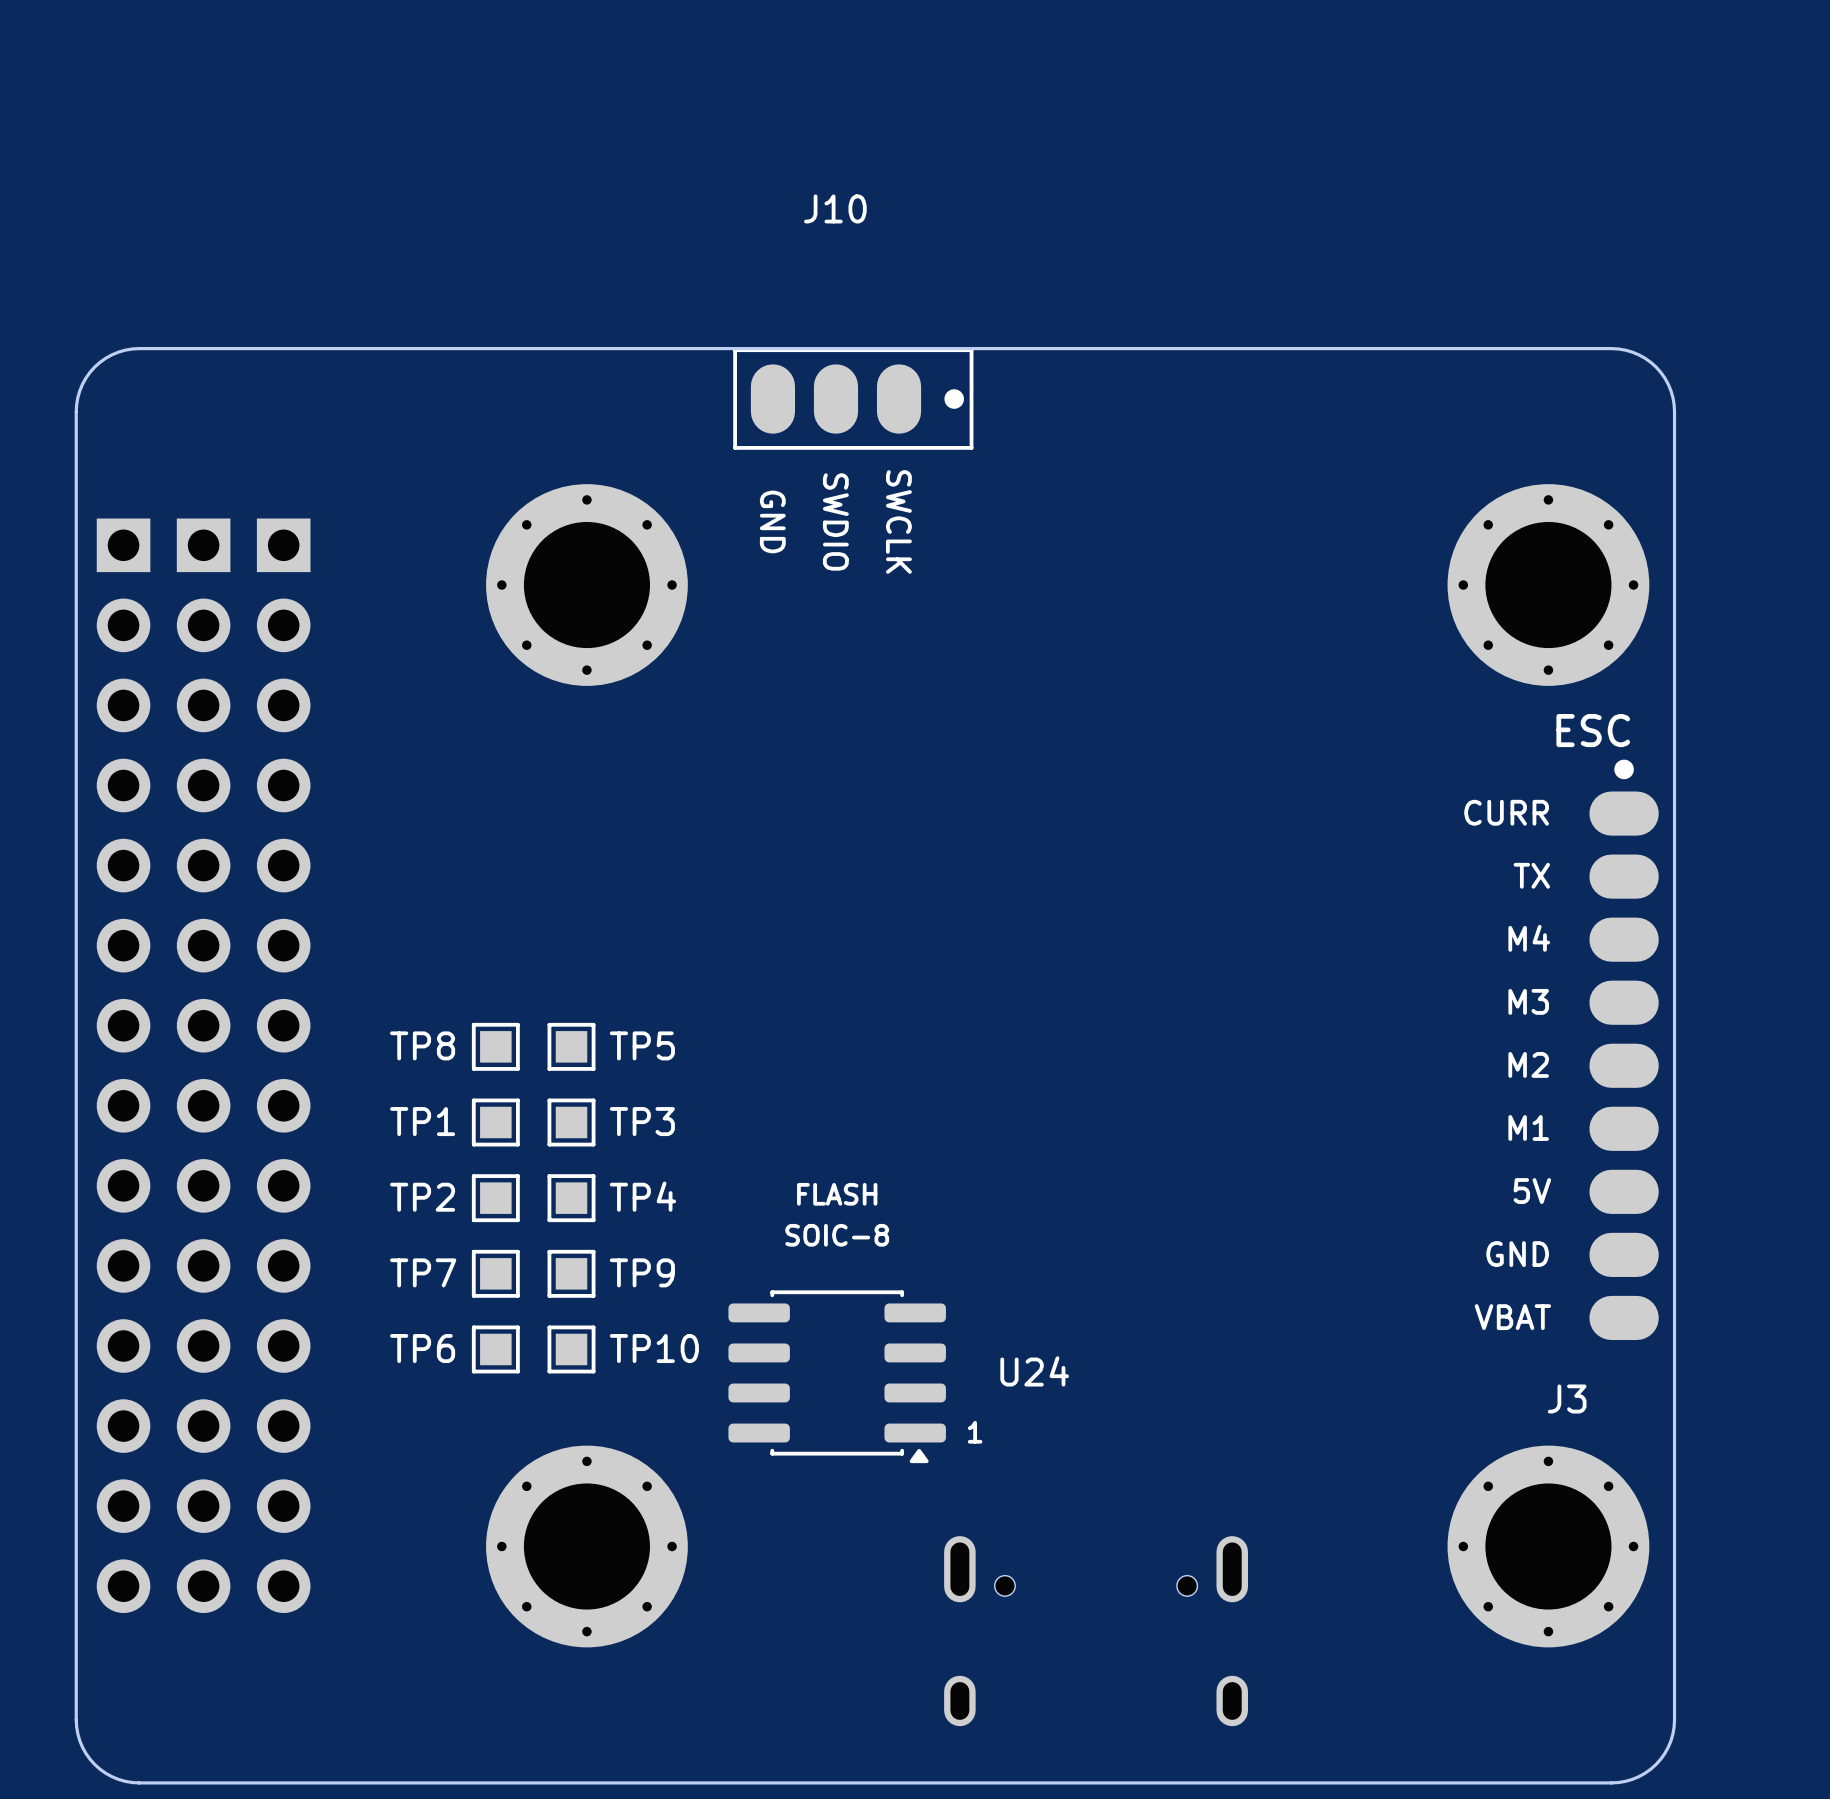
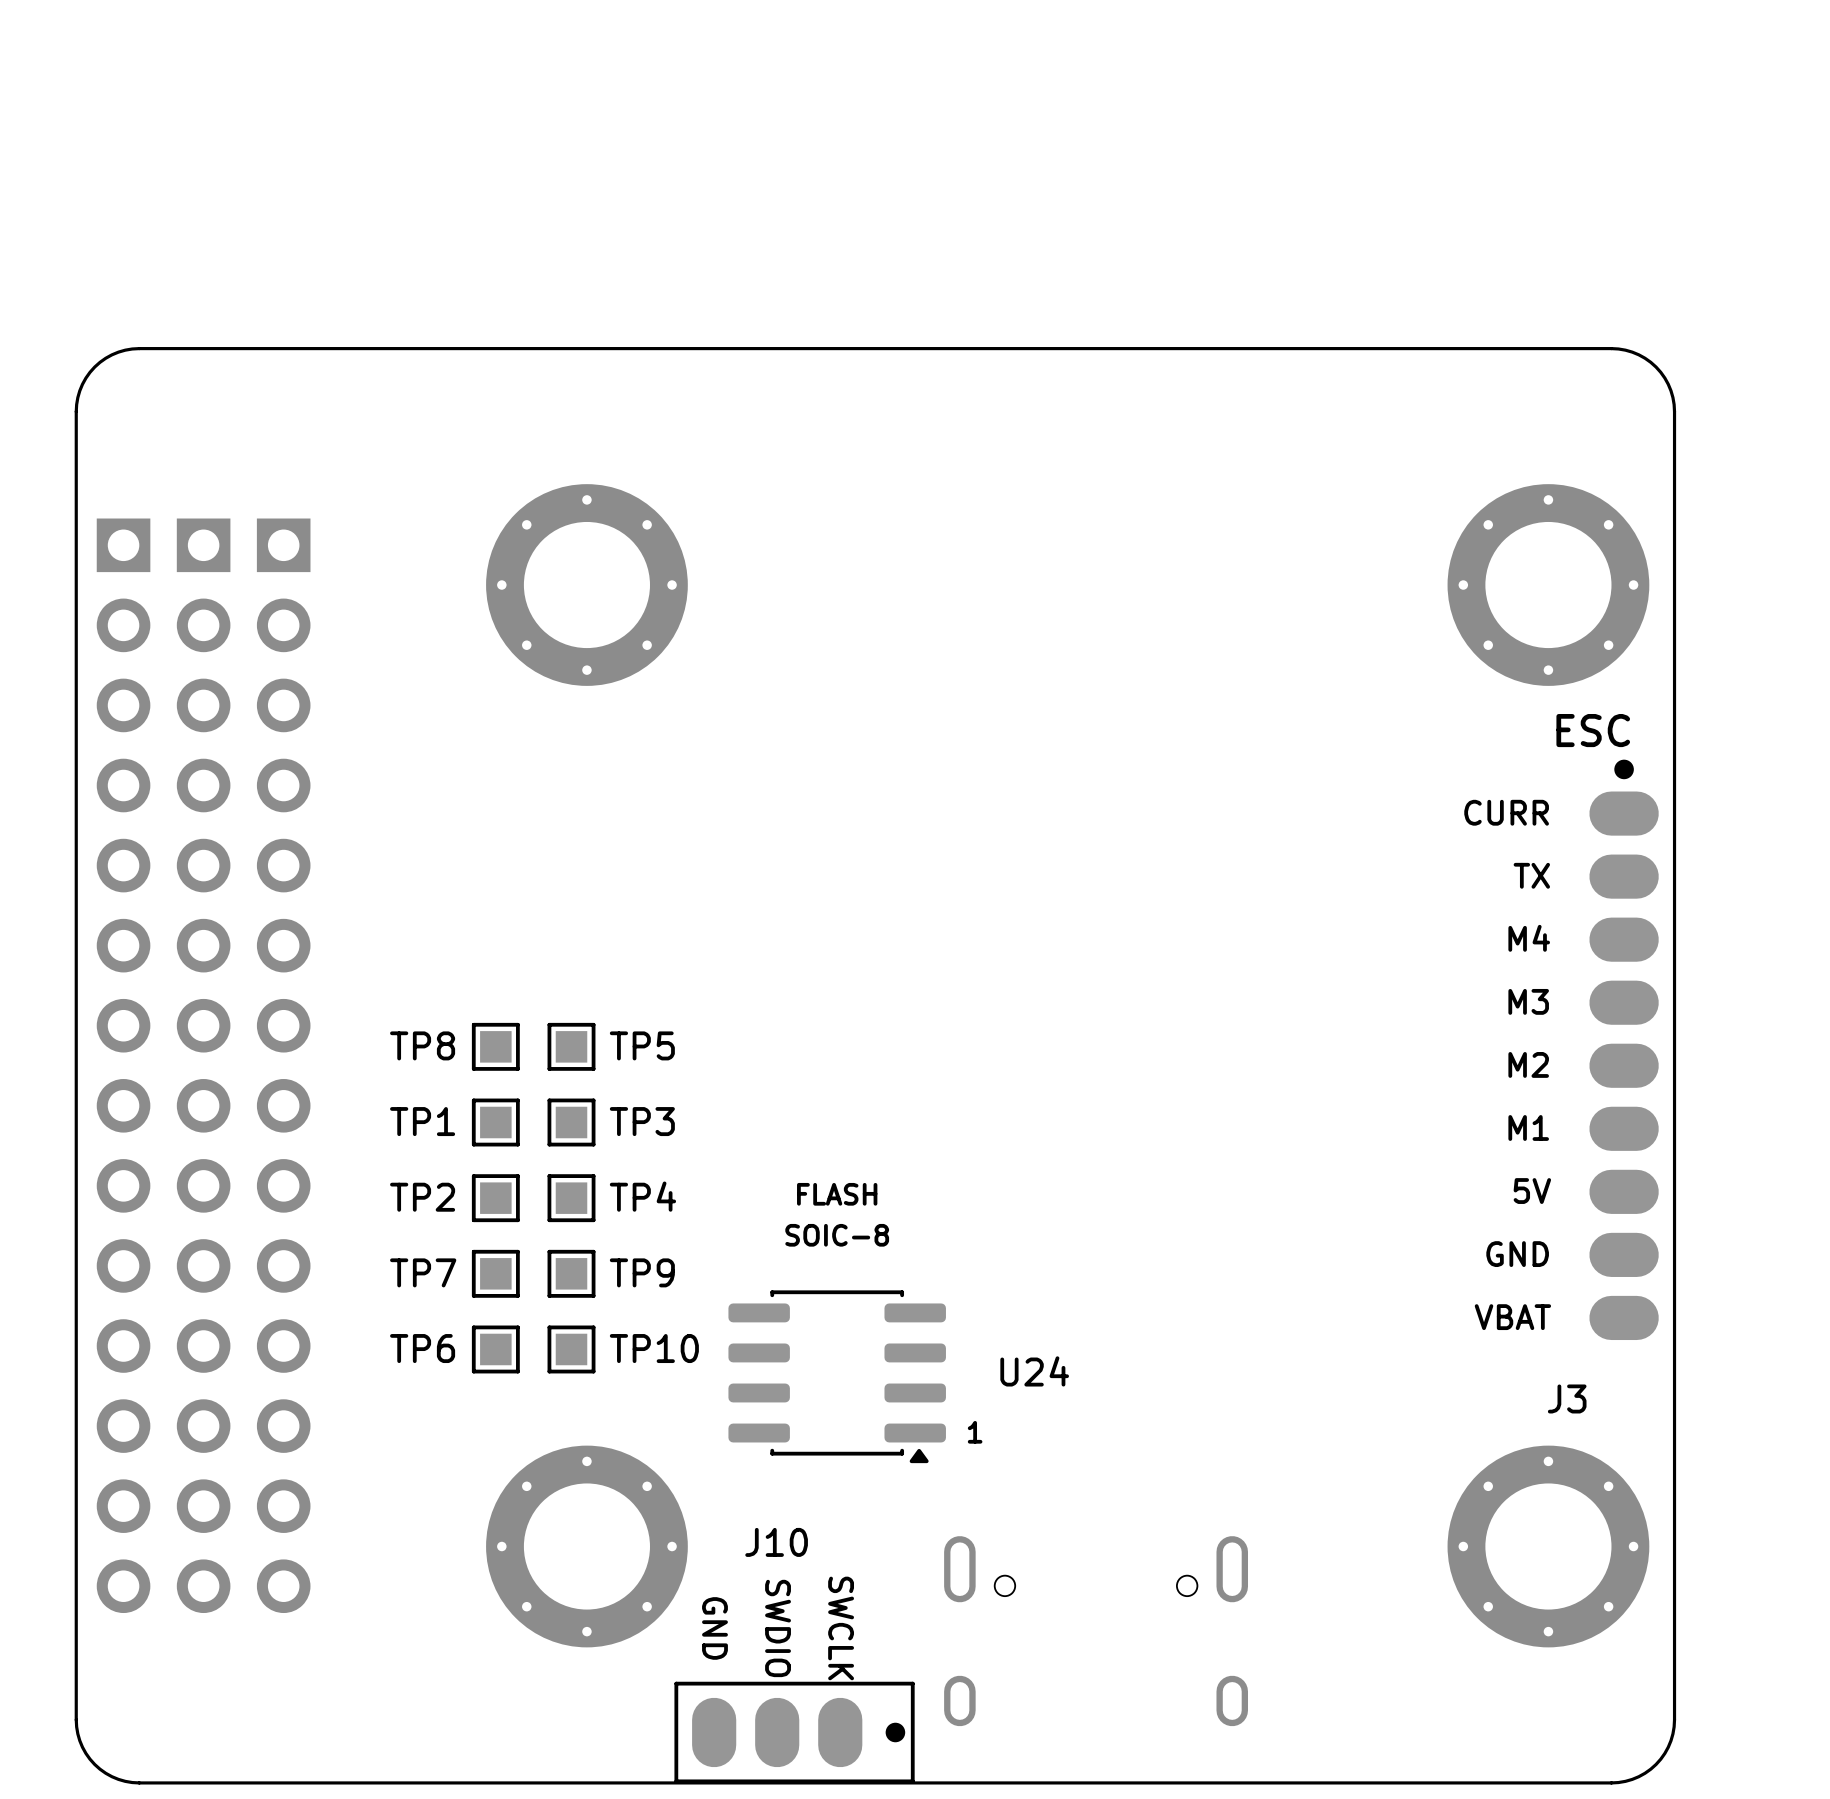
J10 position: (853, 399) -> (794, 1732)
text: GND (772, 521) -> none
text: SWDIO (835, 521) -> none
text: SWCLK (898, 521) -> none
text: none -> GND (714, 1628)
text: none -> SWDIO (778, 1628)
text: none -> SWCLK (841, 1628)

